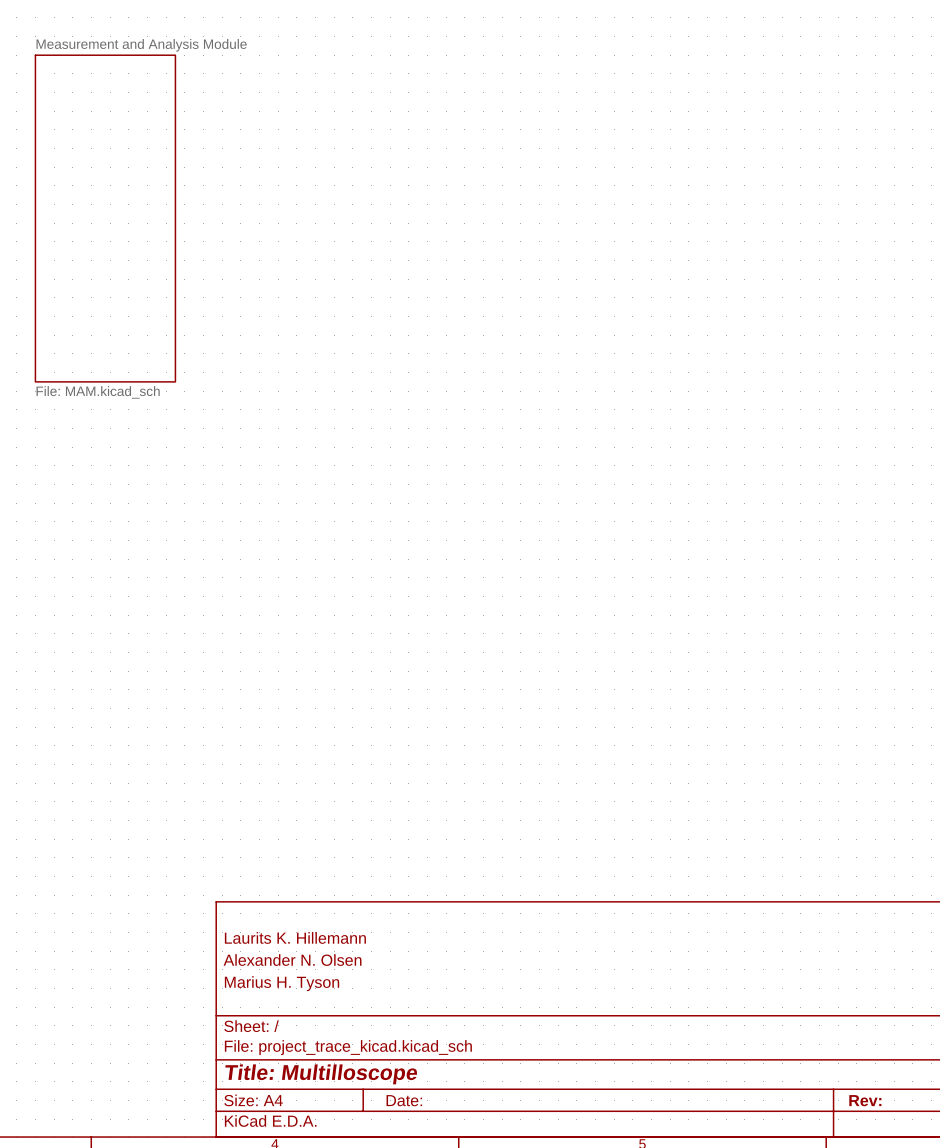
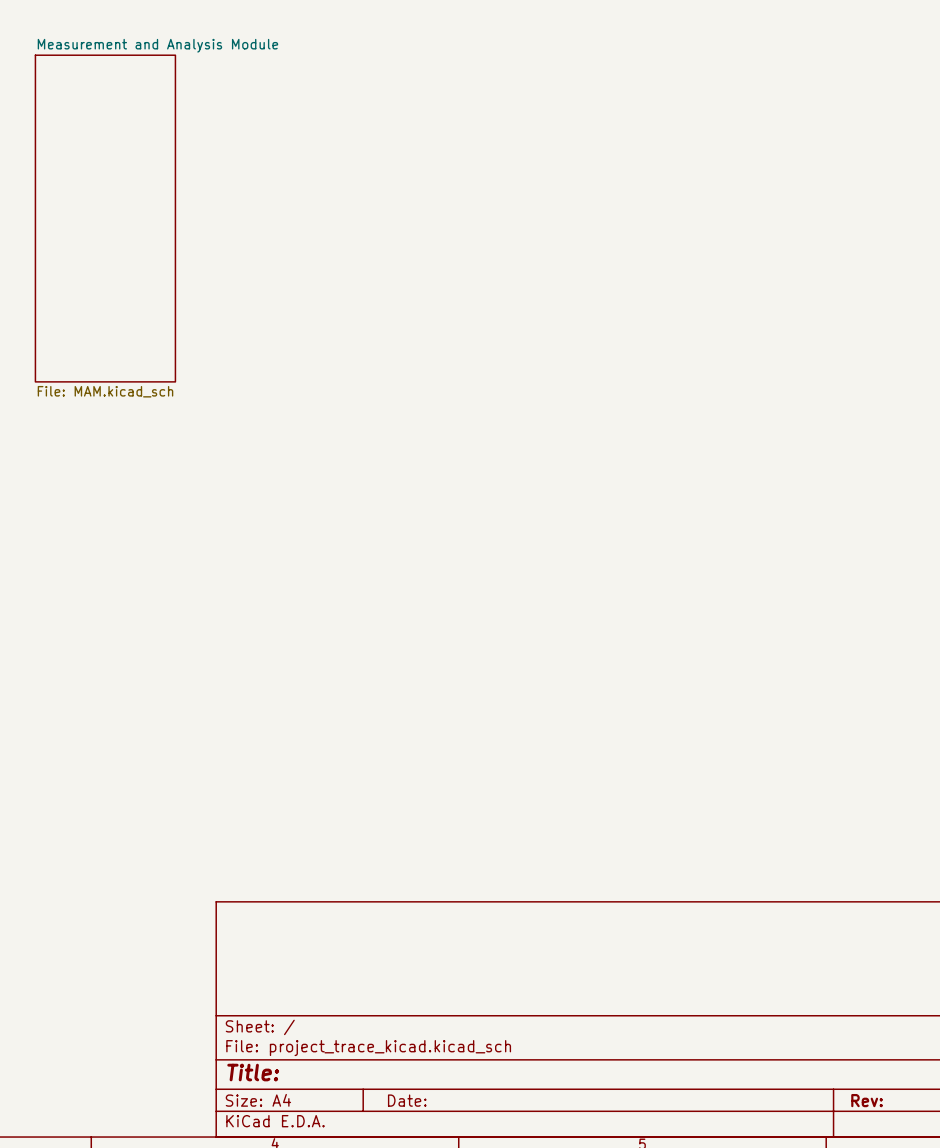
title block: Laurits K. Hillemann (295, 937) -> none
title block: Alexander N. Olsen (292, 960) -> none
title block: Marius H. Tyson (282, 983) -> none
title block: Title: Multilloscope (321, 1074) -> Title: (253, 1072)

